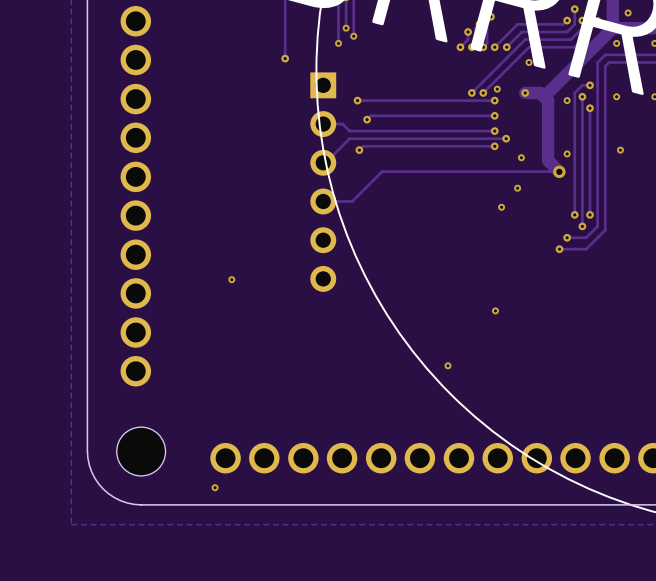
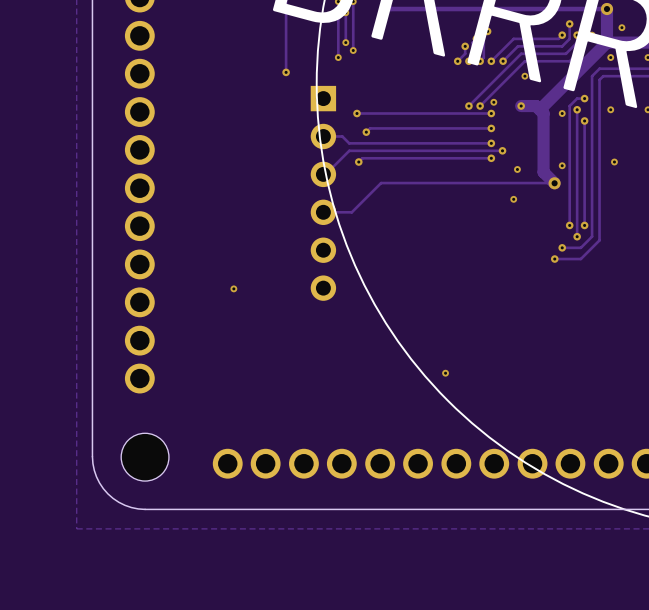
via: (501, 207) -> none
via: (495, 310) -> none
via: (215, 487) -> none

